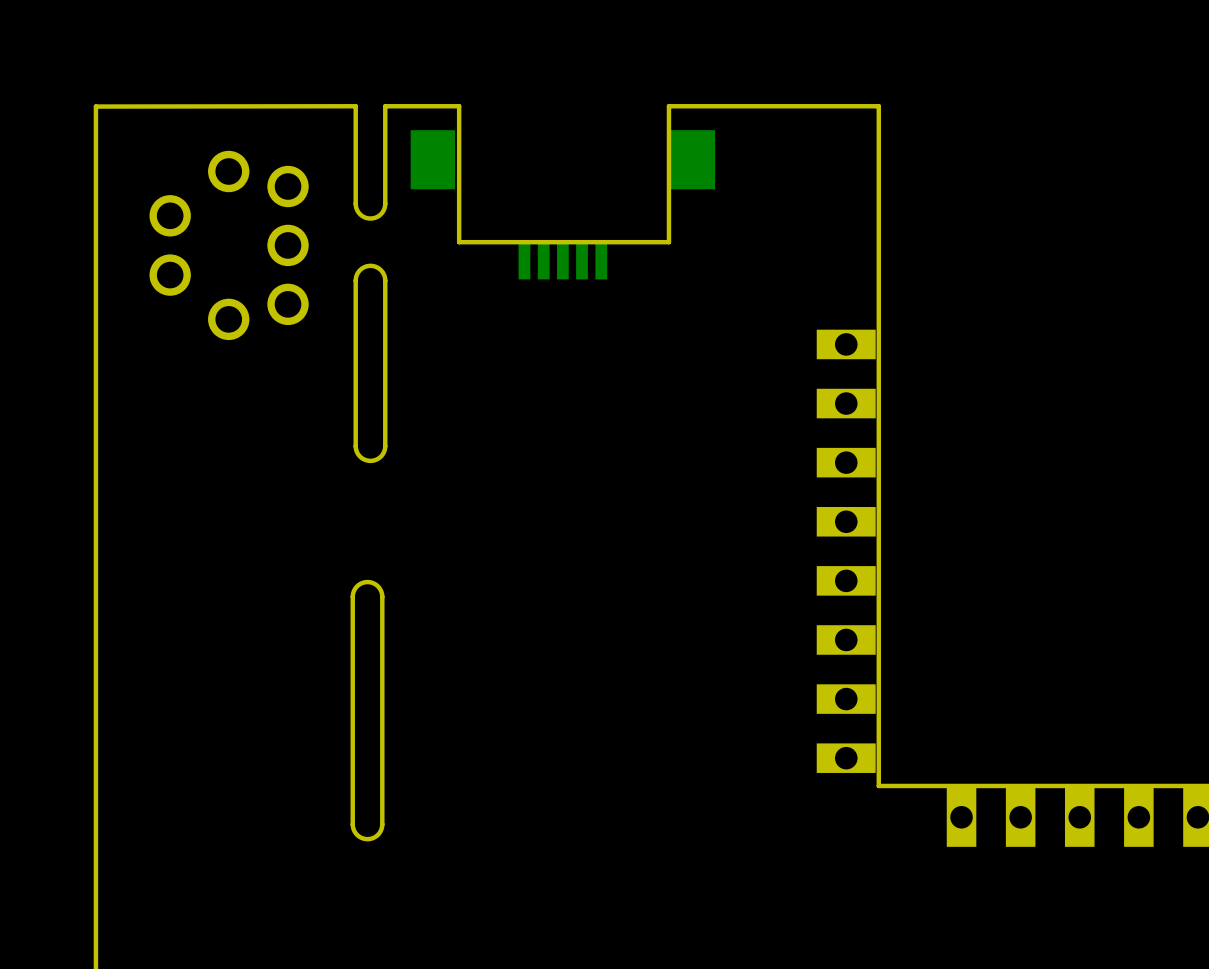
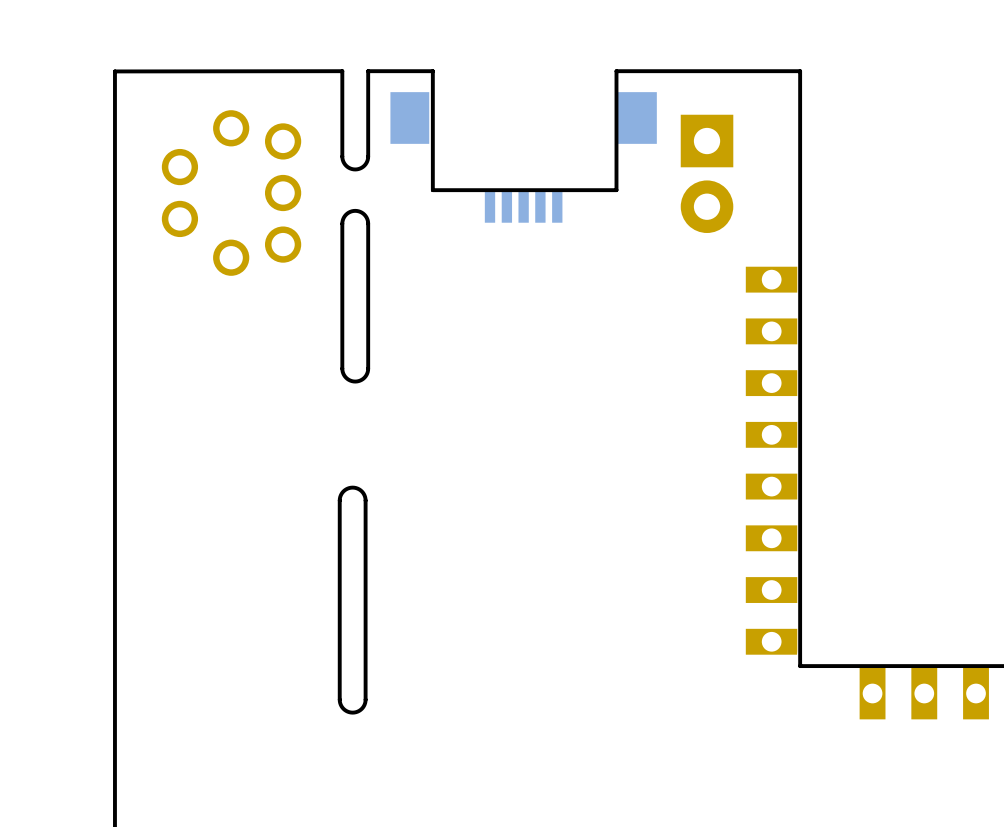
part: none -> (707, 173)

